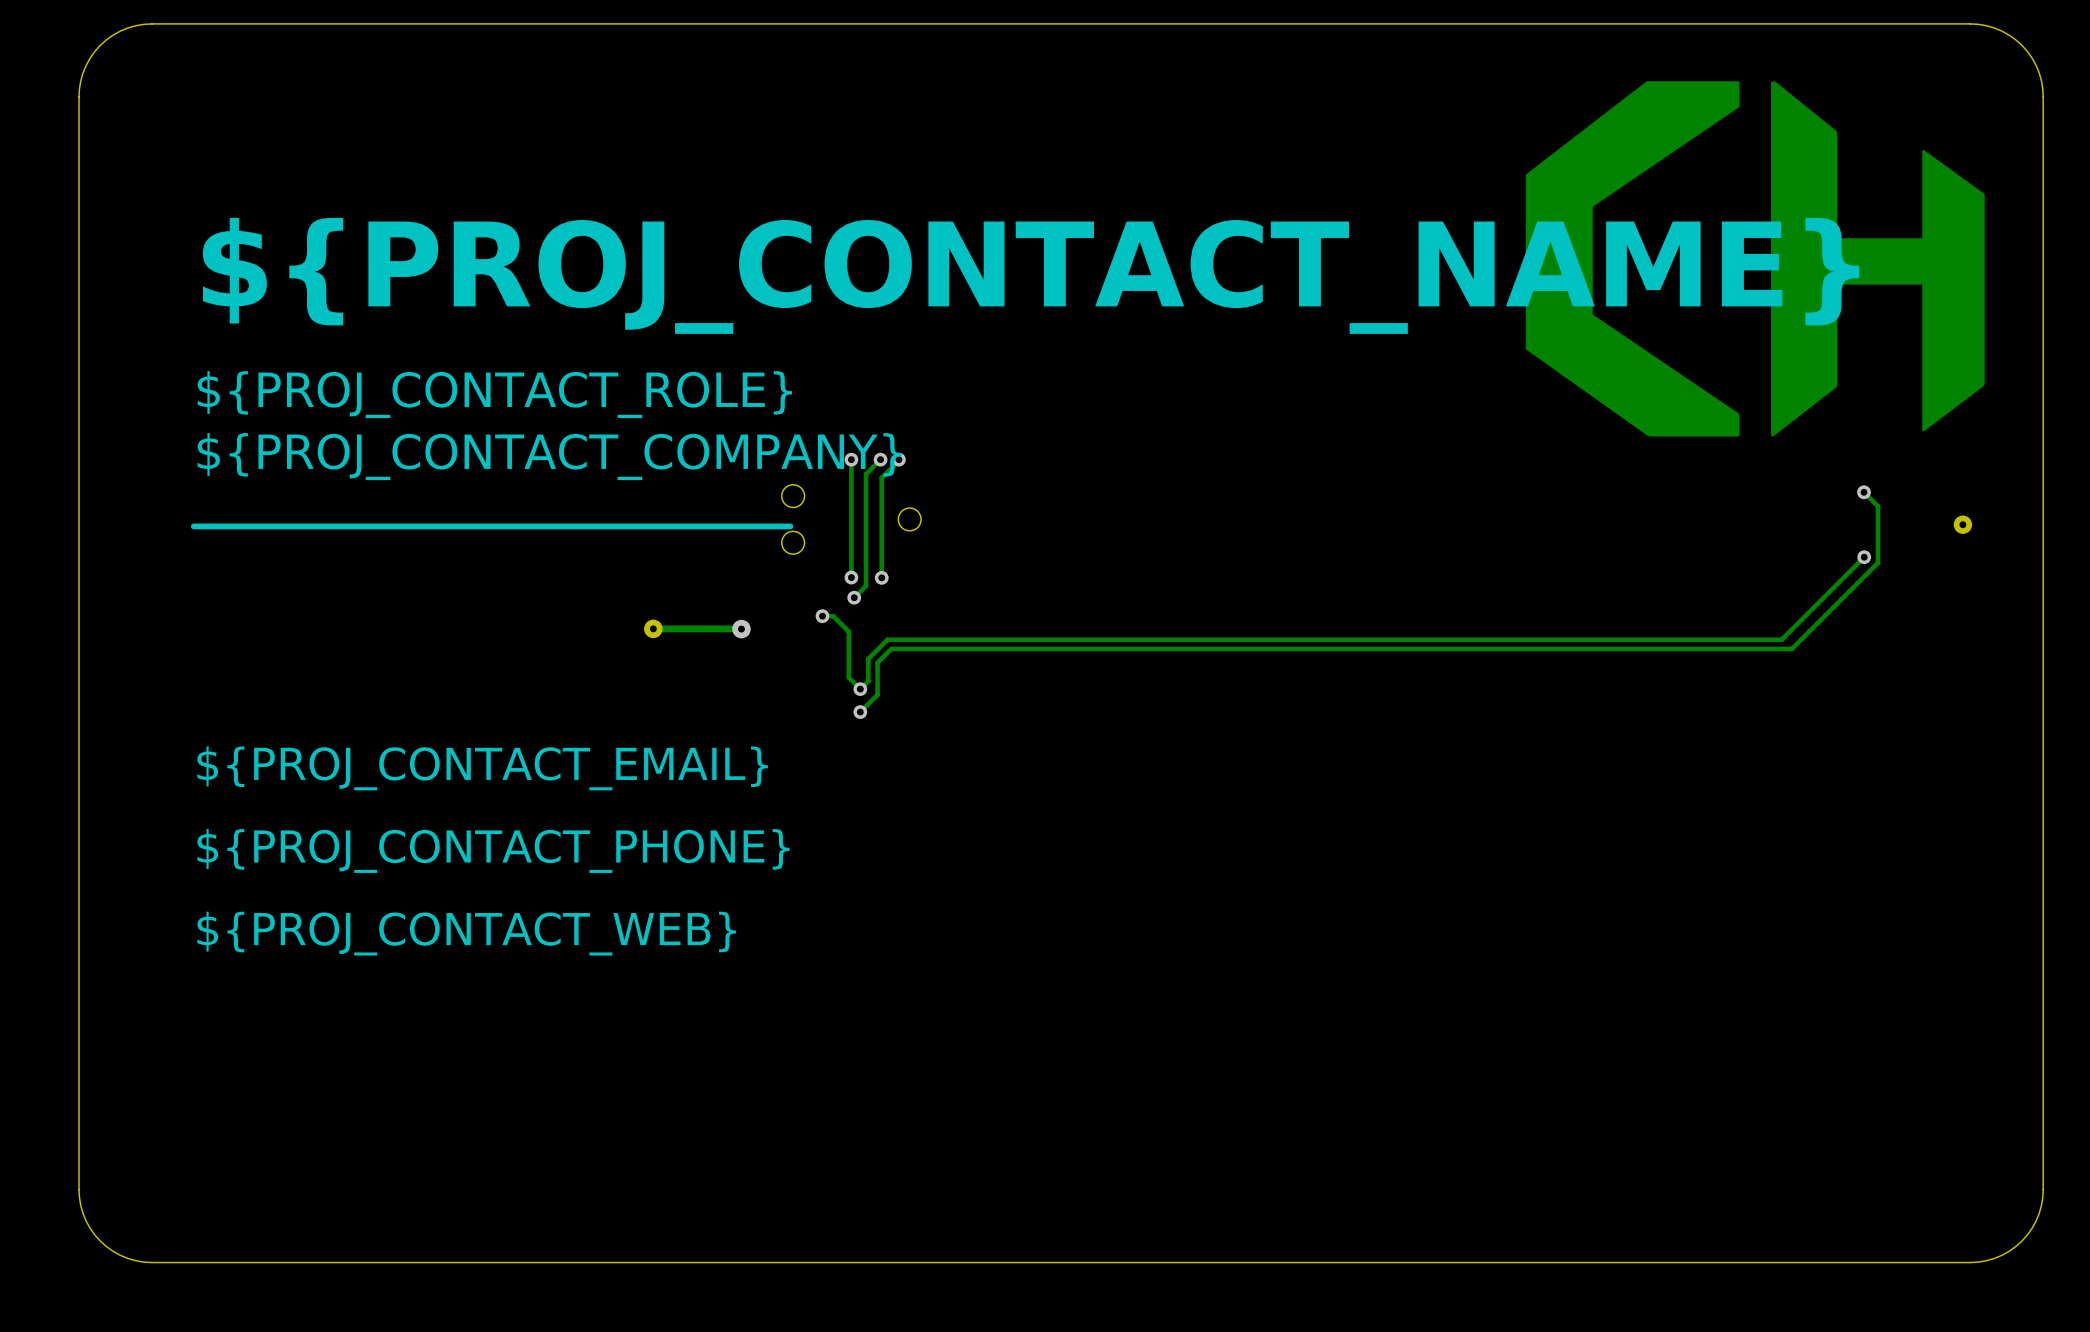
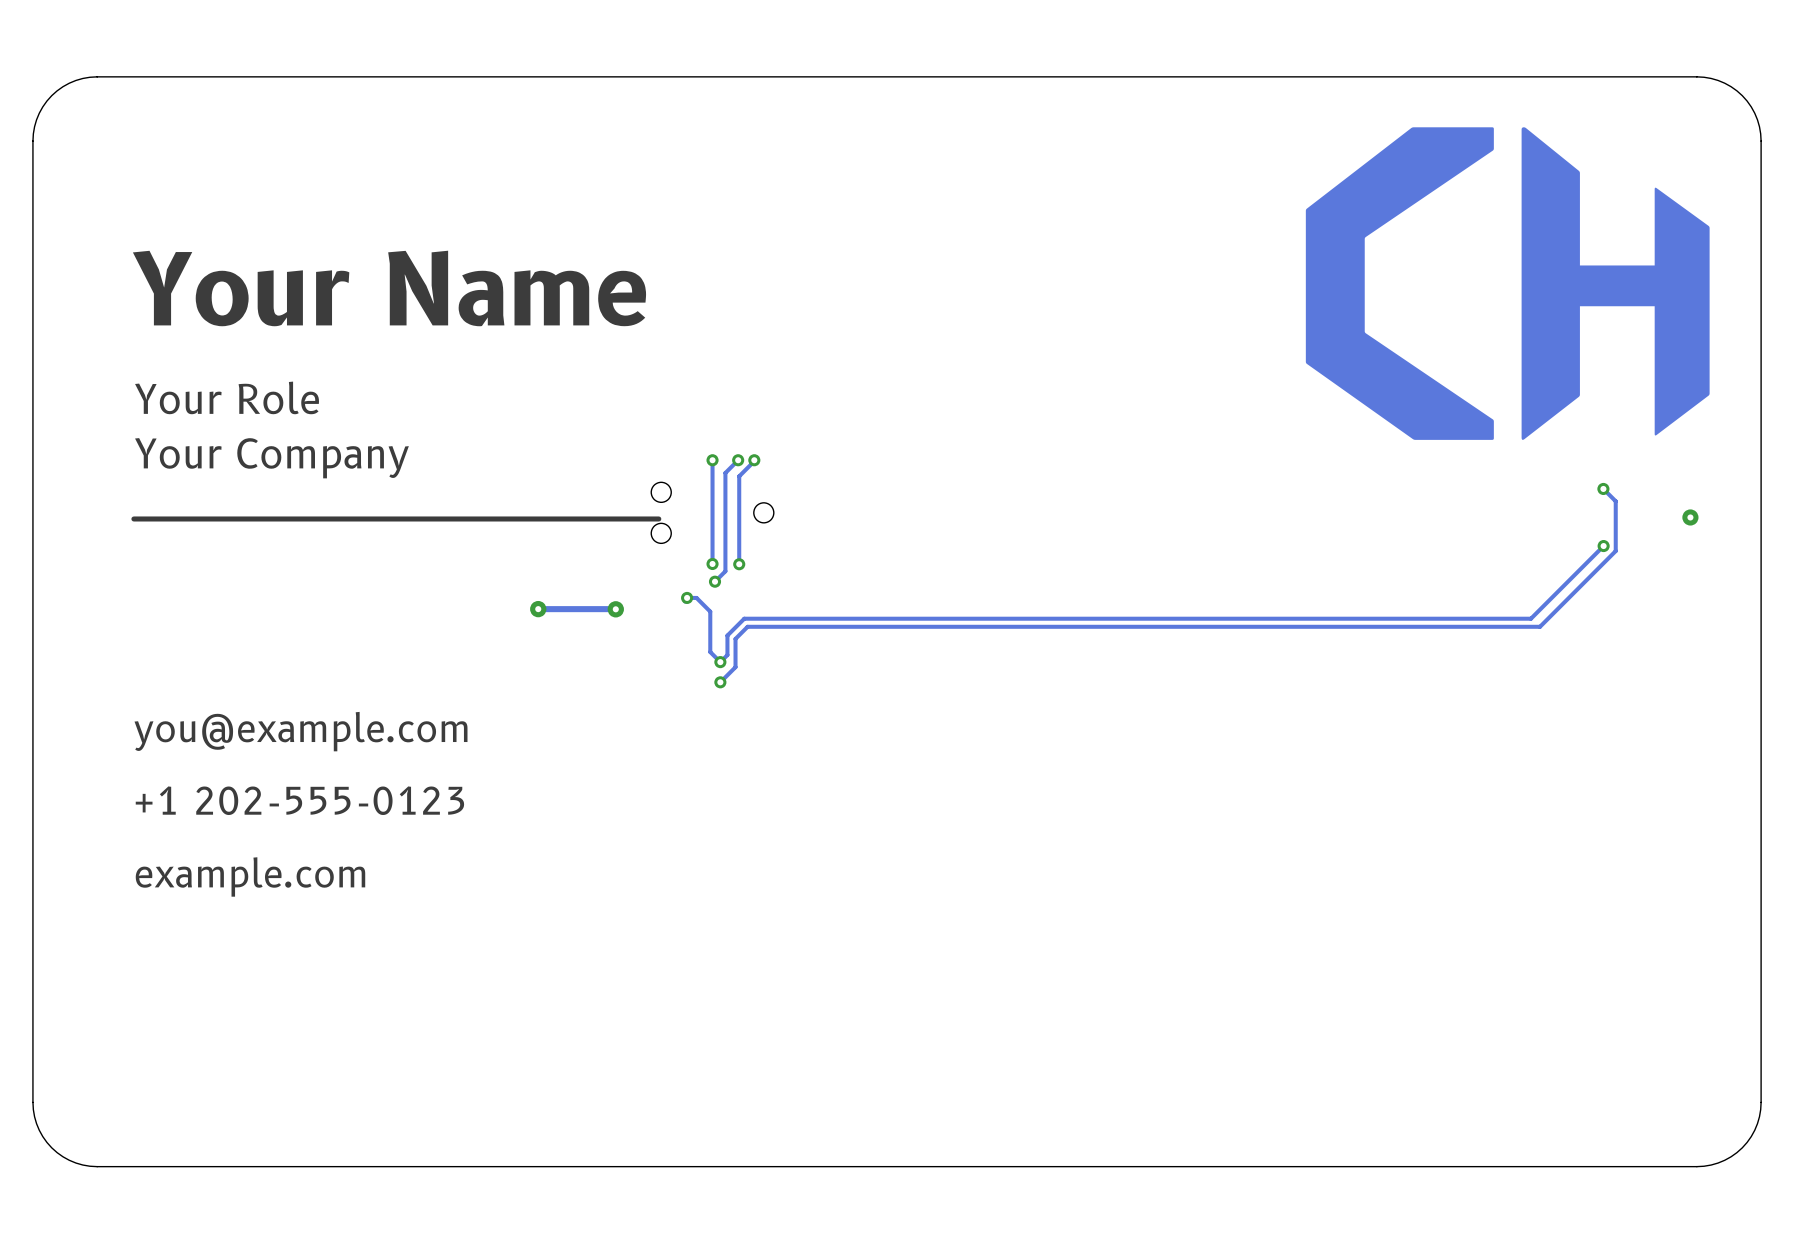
drawing shape: [190, 217, 1860, 956] -> [131, 250, 662, 897]

